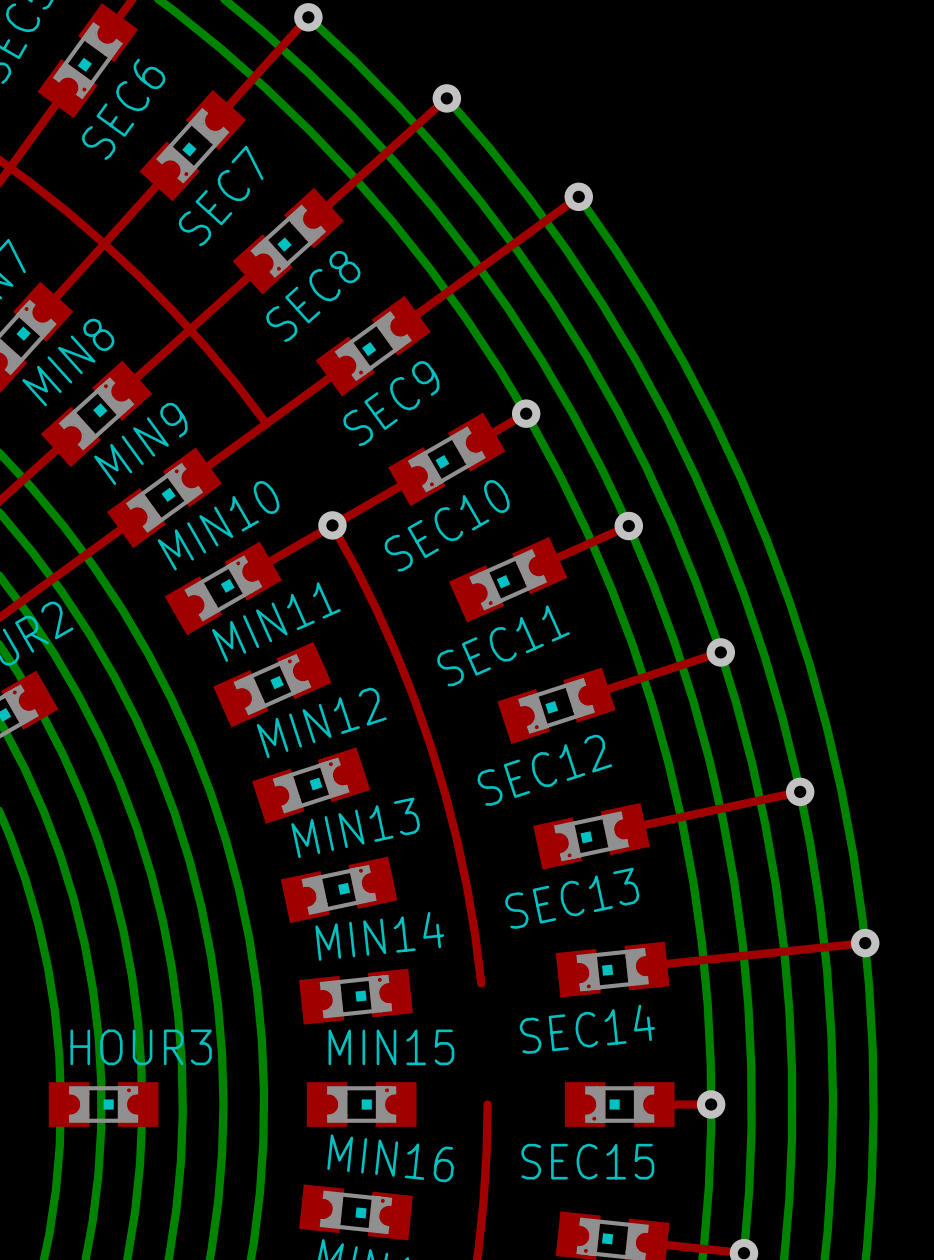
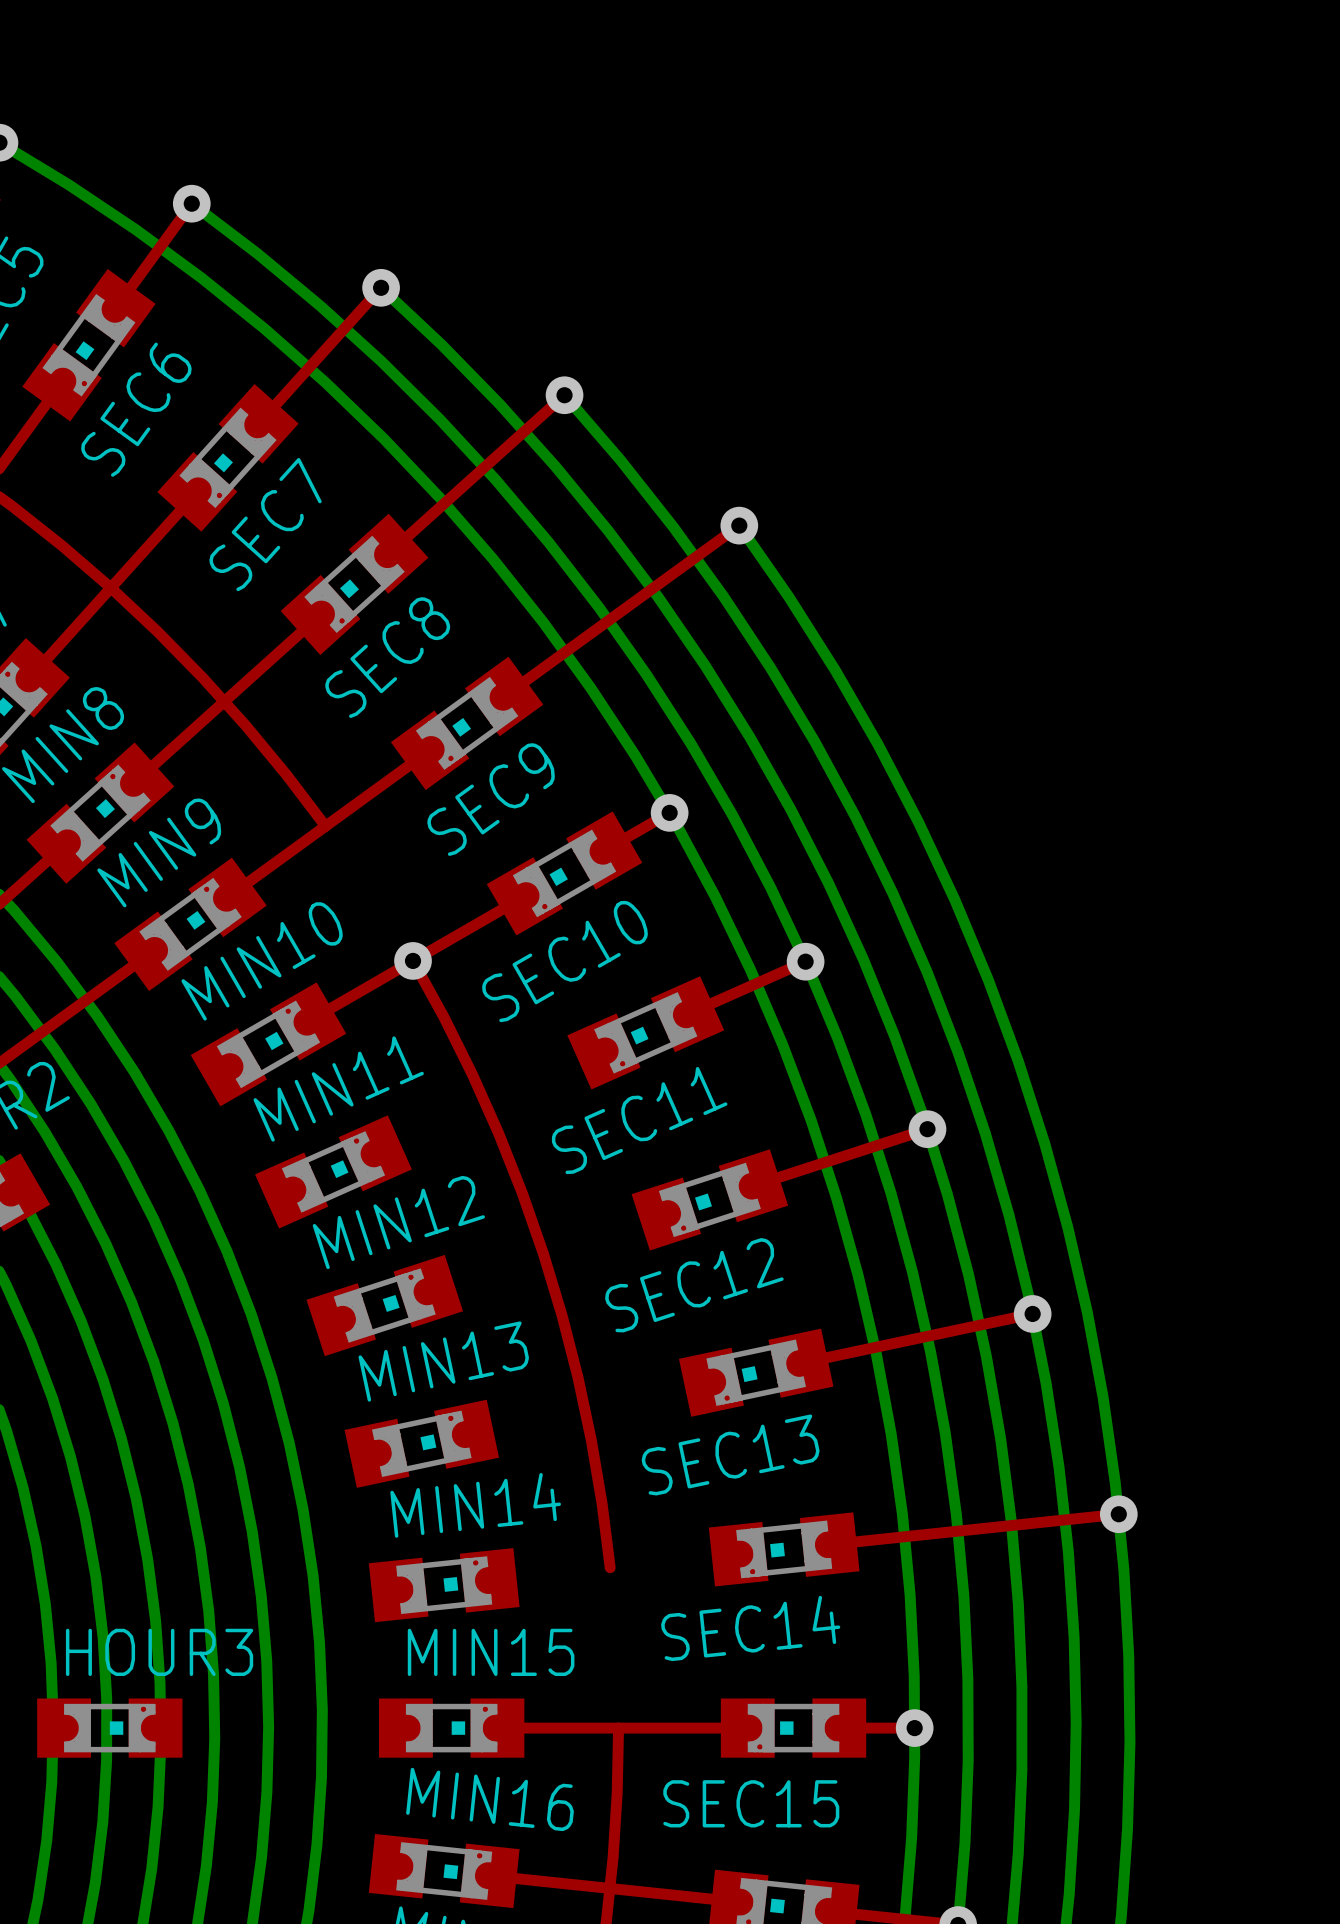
top track: none -> (497, 1728) (747, 1728)
top track: none -> (489, 1875) (738, 1901)

